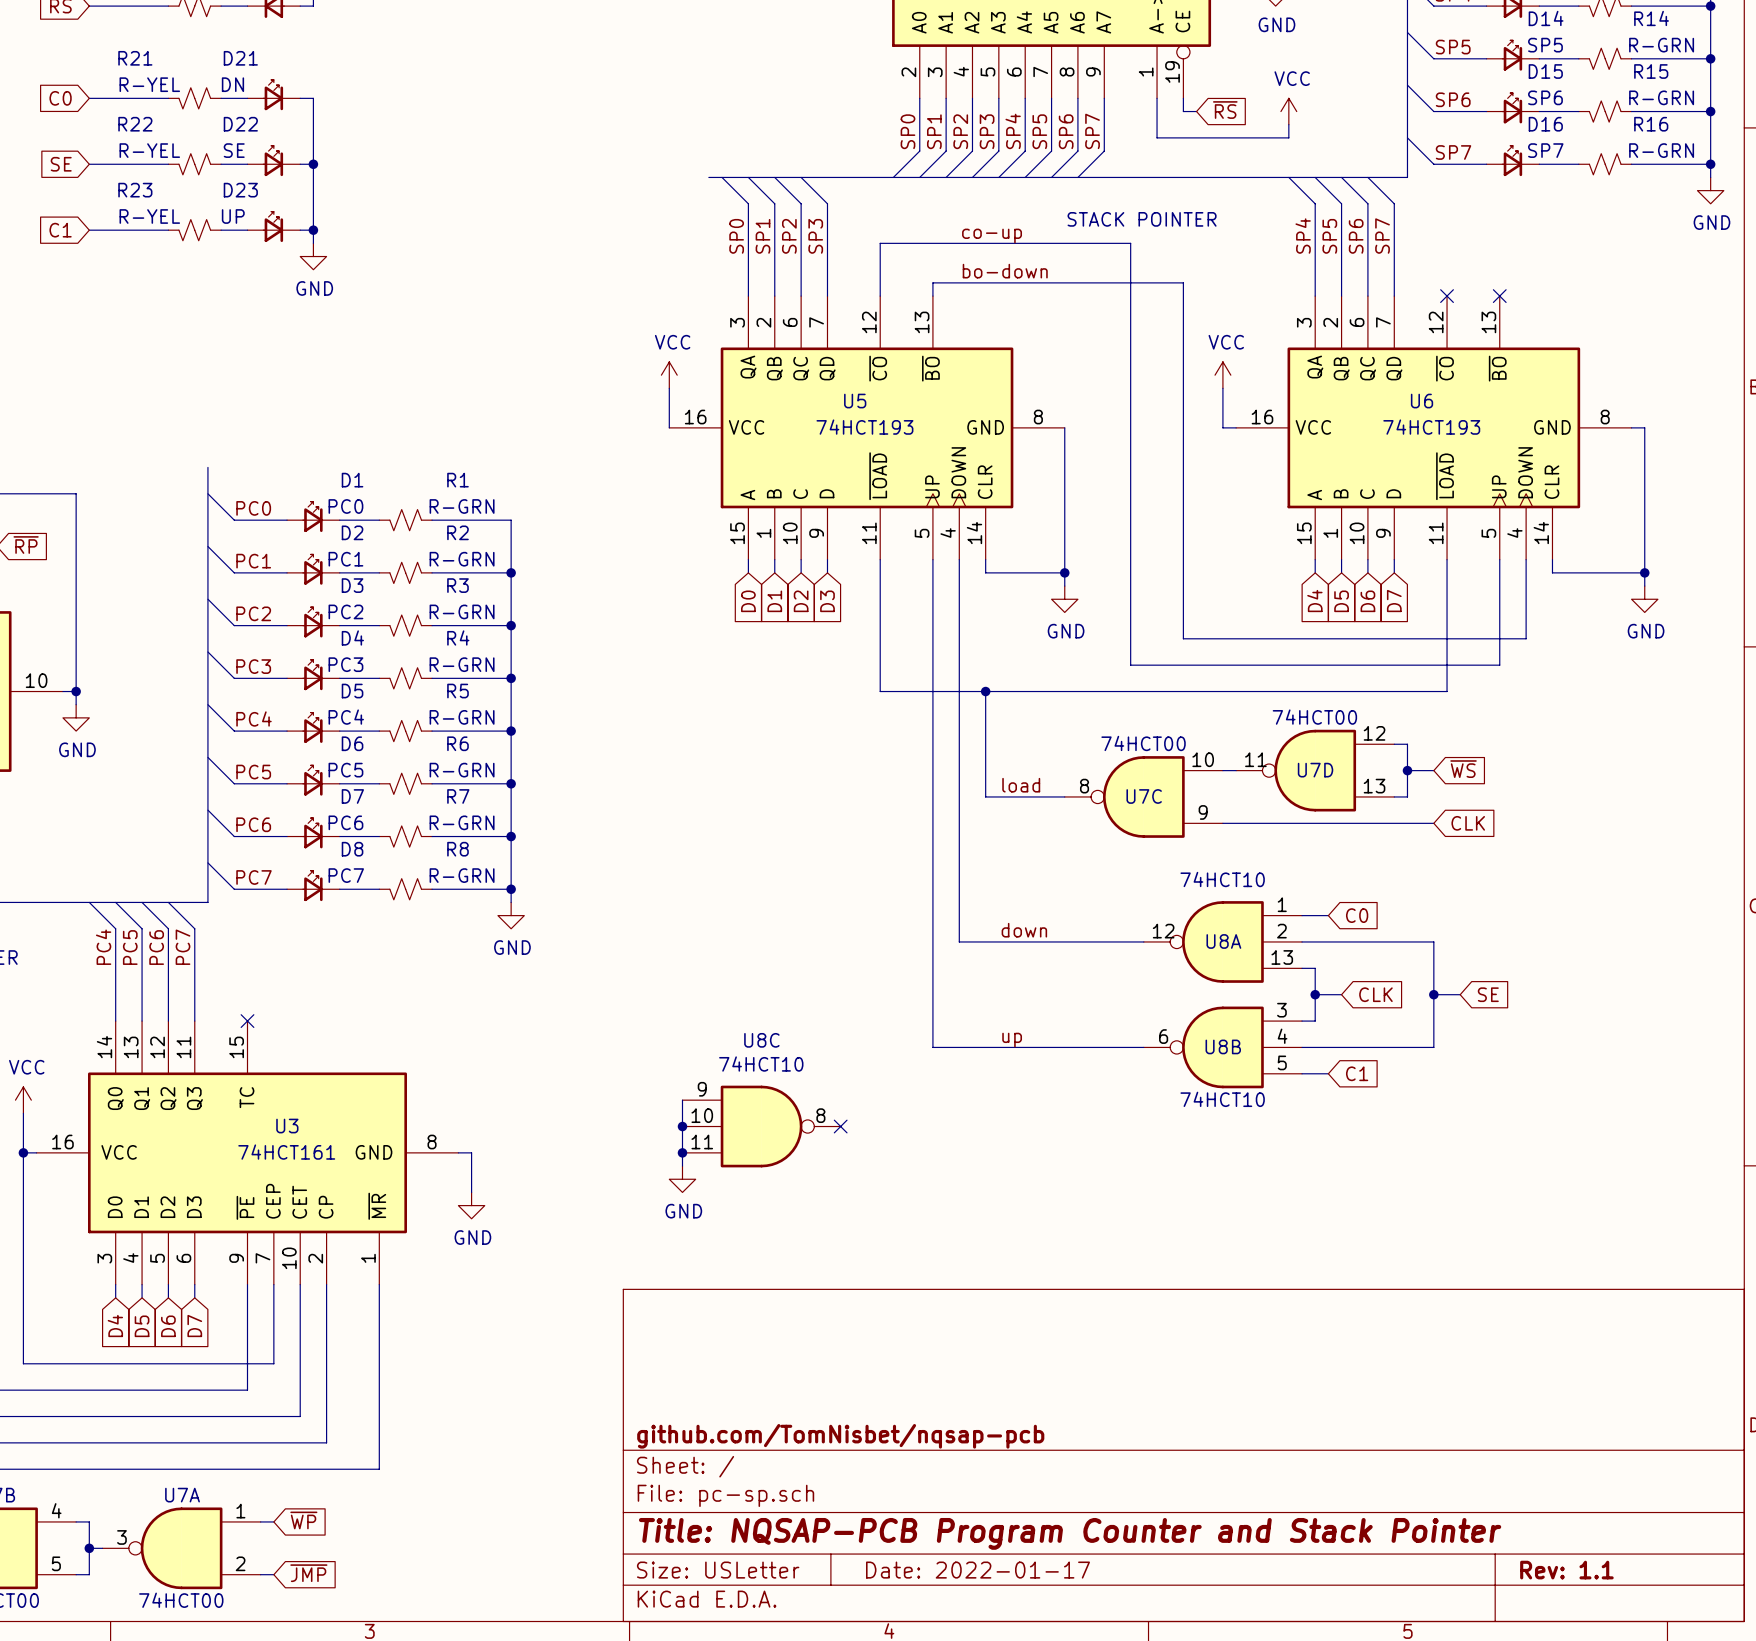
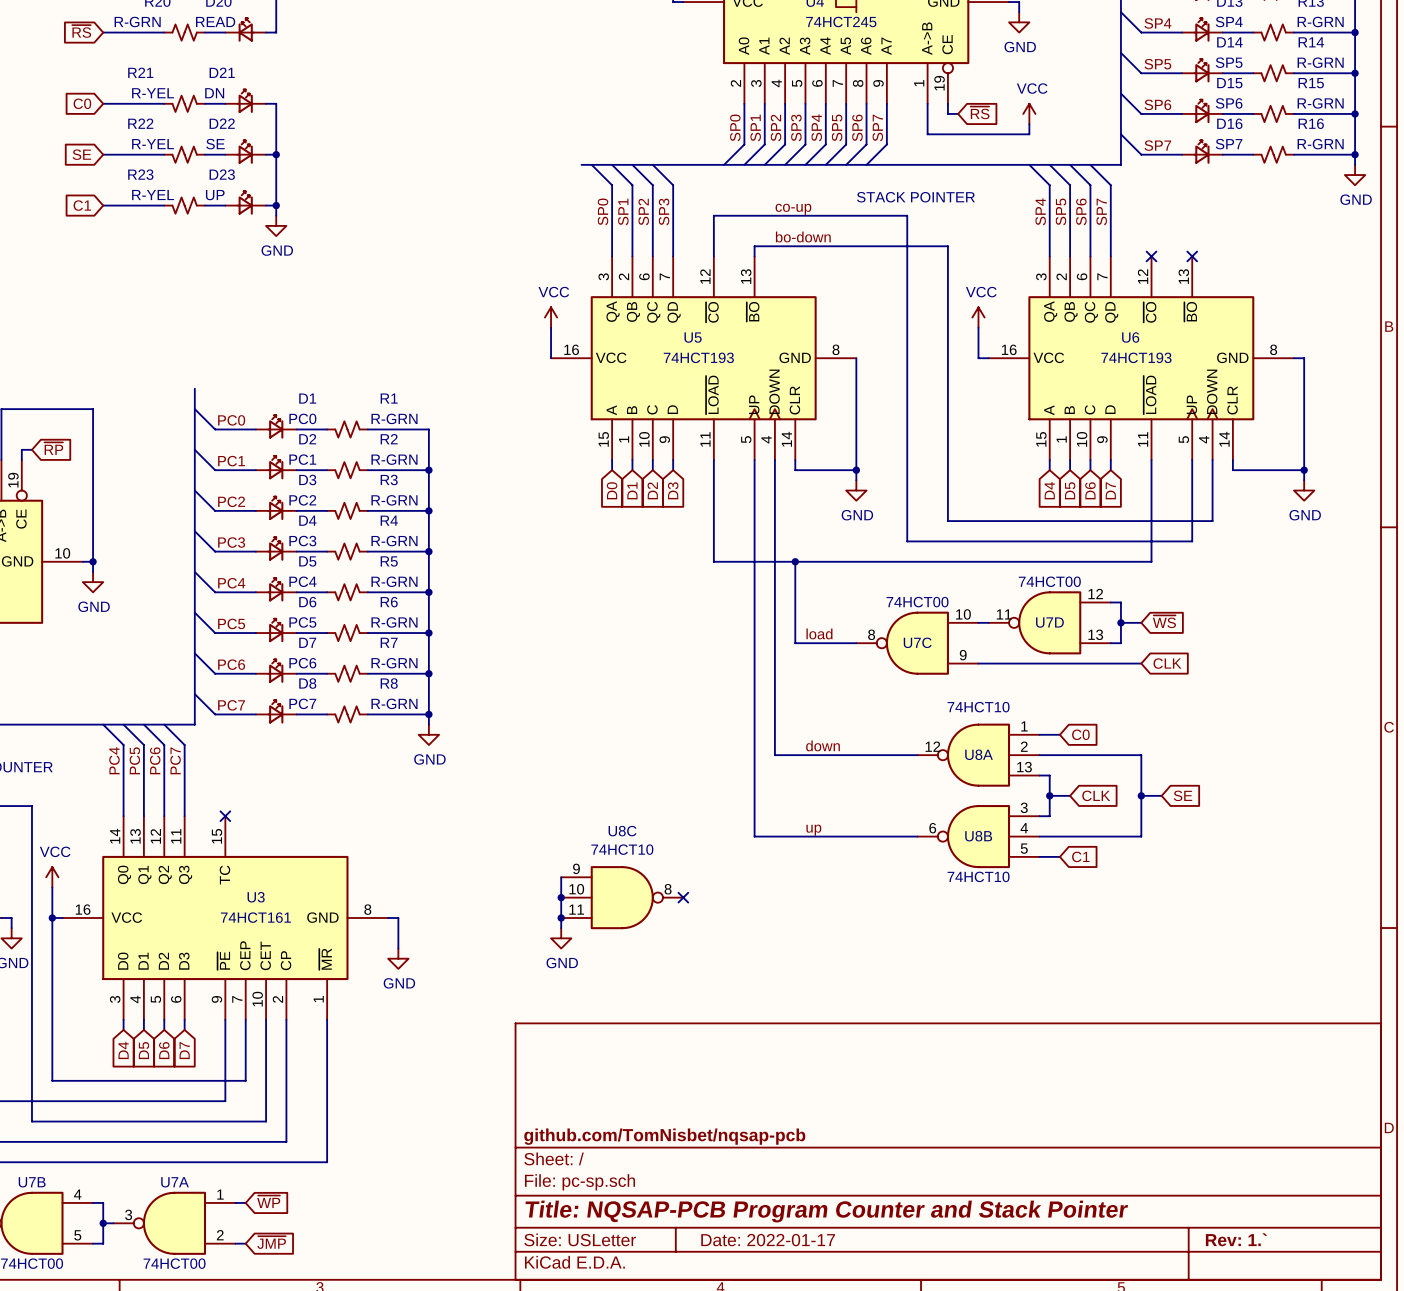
title block: Rev: 1.1 (1566, 1570) -> Rev: 1.` (1236, 1239)

